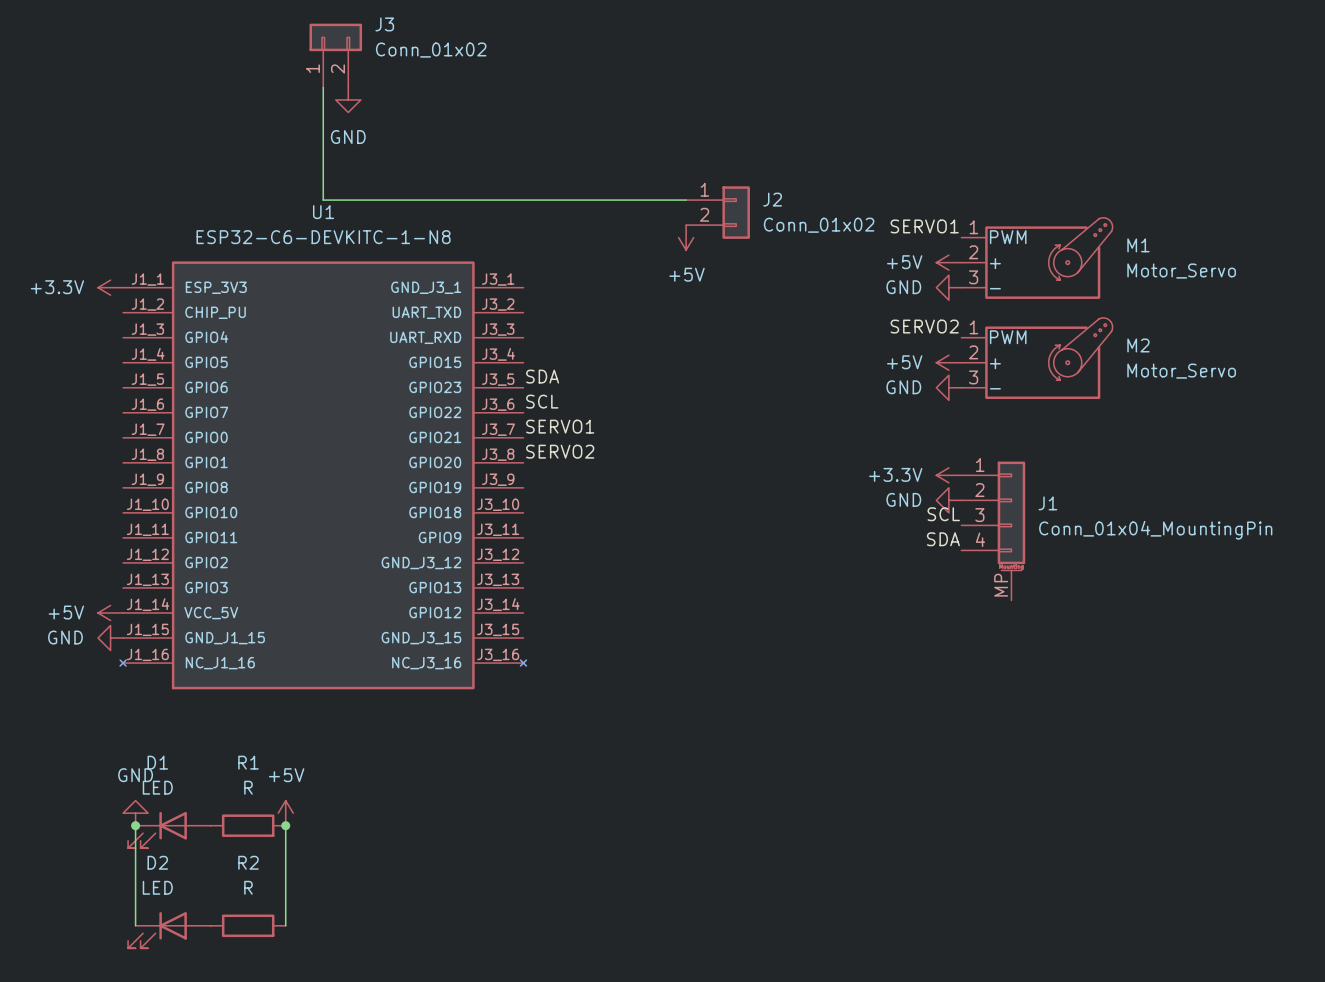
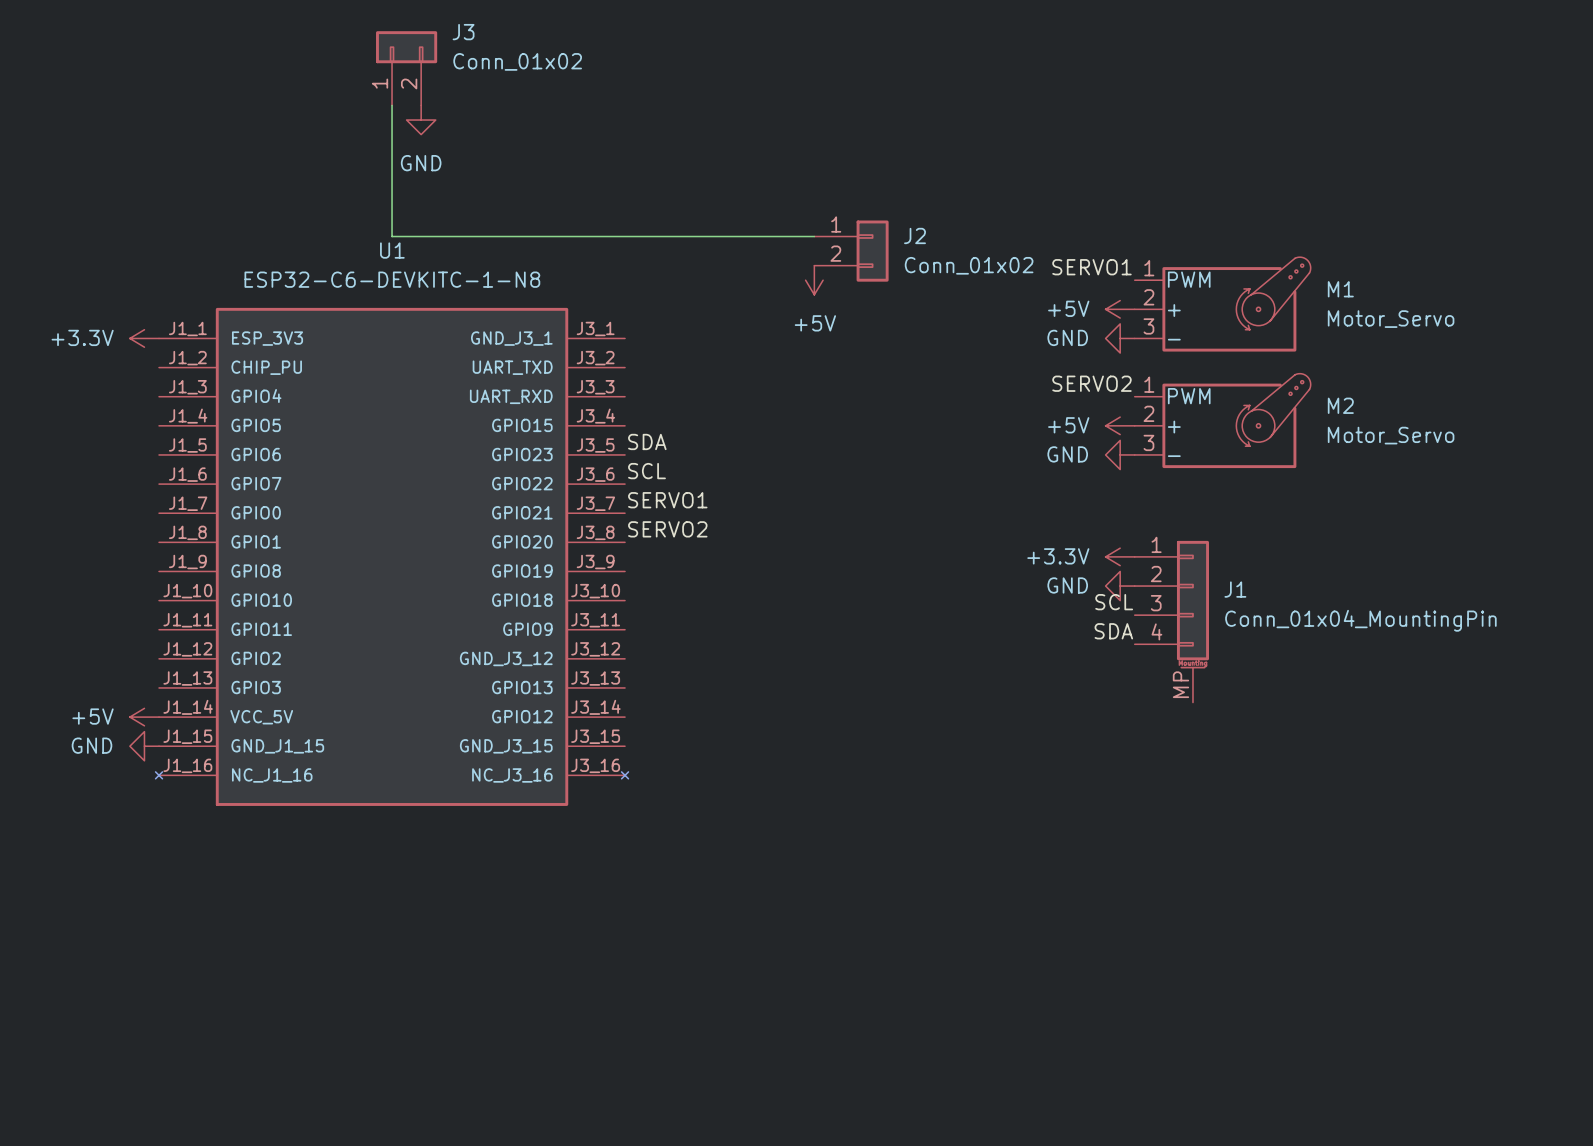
power symbol: GND (135, 813) -> none
power symbol: +5V (285, 813) -> none
wire: (135, 825) (135, 925) -> none
junction: (135, 825) -> none
R1: R (248, 825) -> none
wire: (285, 825) (285, 925) -> none
junction: (285, 825) -> none
D1: LED (169, 830) -> none
R2: R (248, 925) -> none
D2: LED (169, 930) -> none

